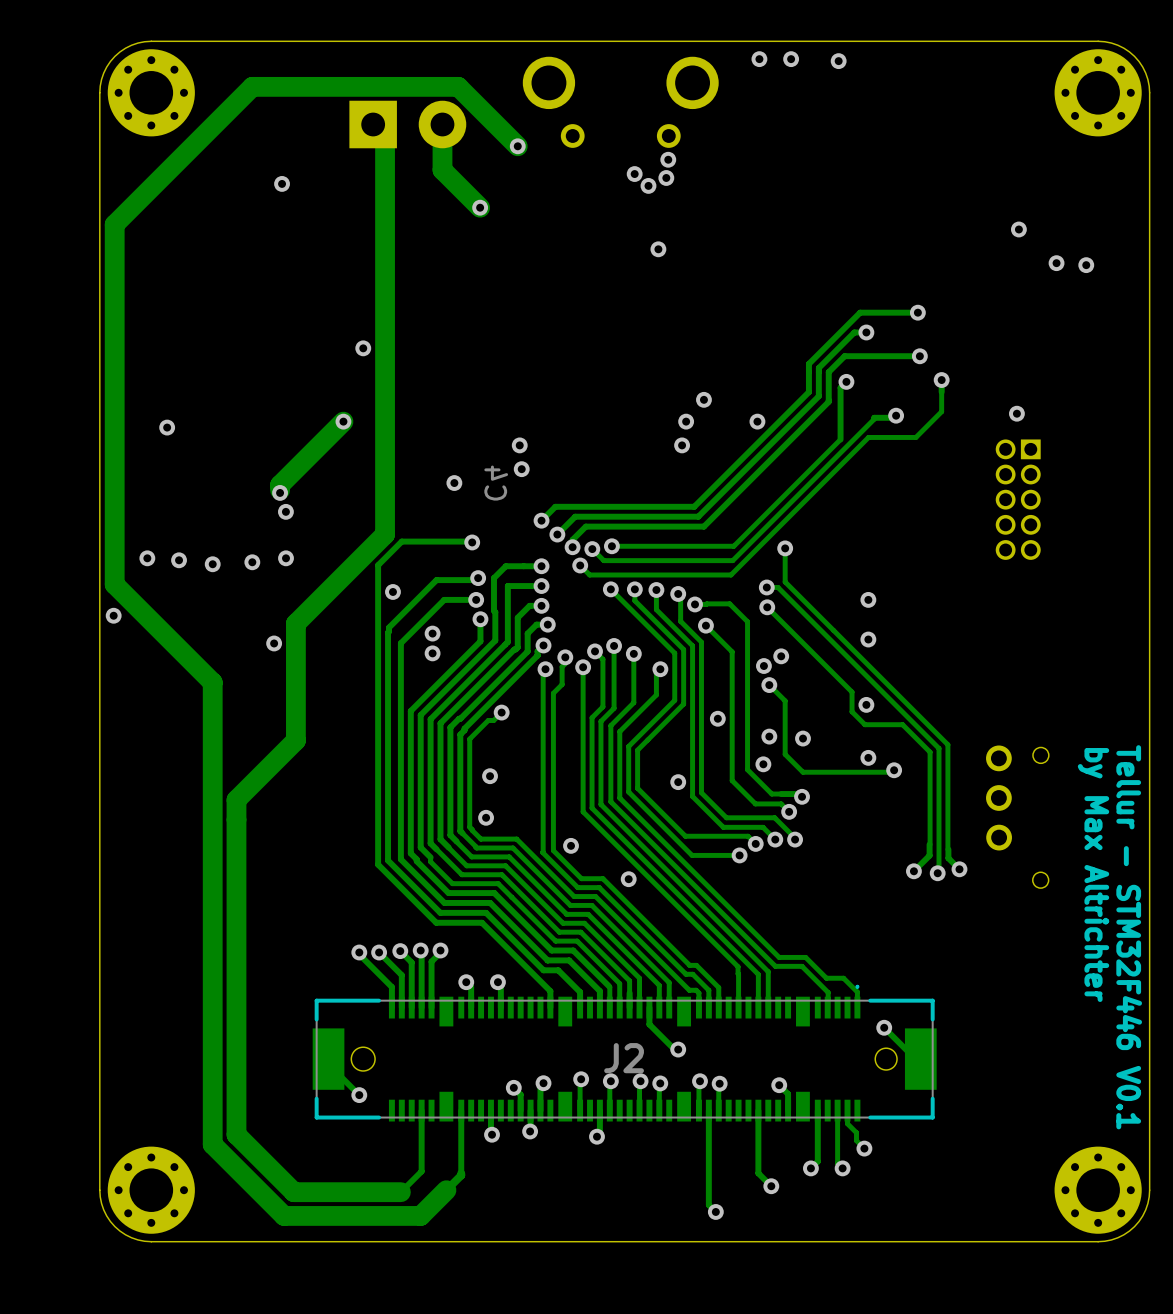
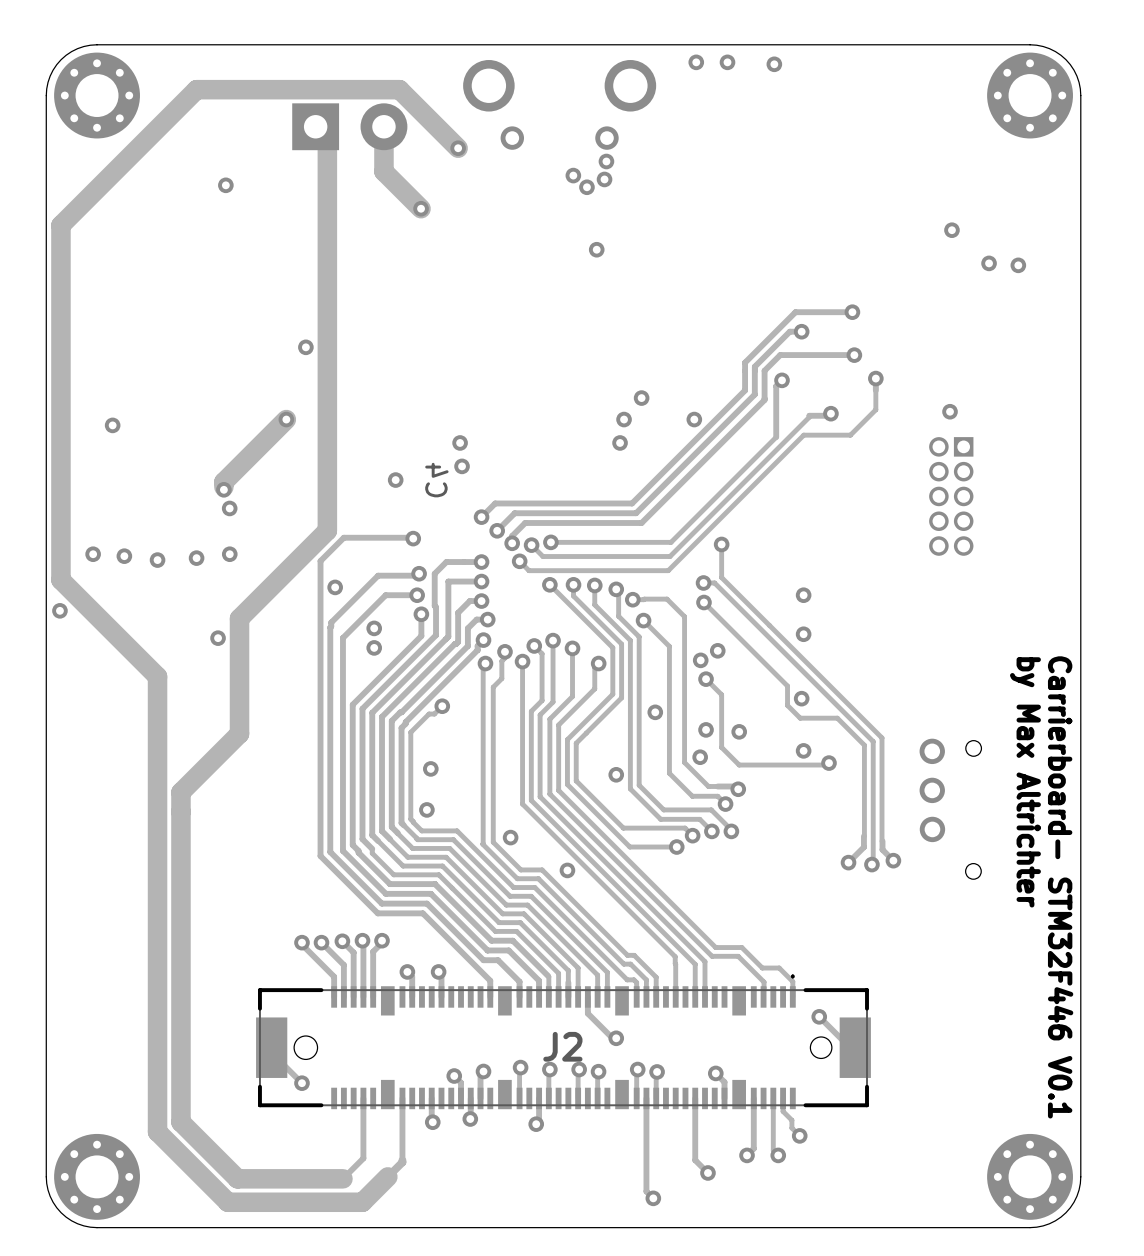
text position: by Max Altrichter (1093, 875) -> by Max Altrichter (1025, 782)
text: Tellur - STM32F446 V0.1 (1129, 937) -> Carrierboard- STM32F446 V0.1 (1060, 887)

